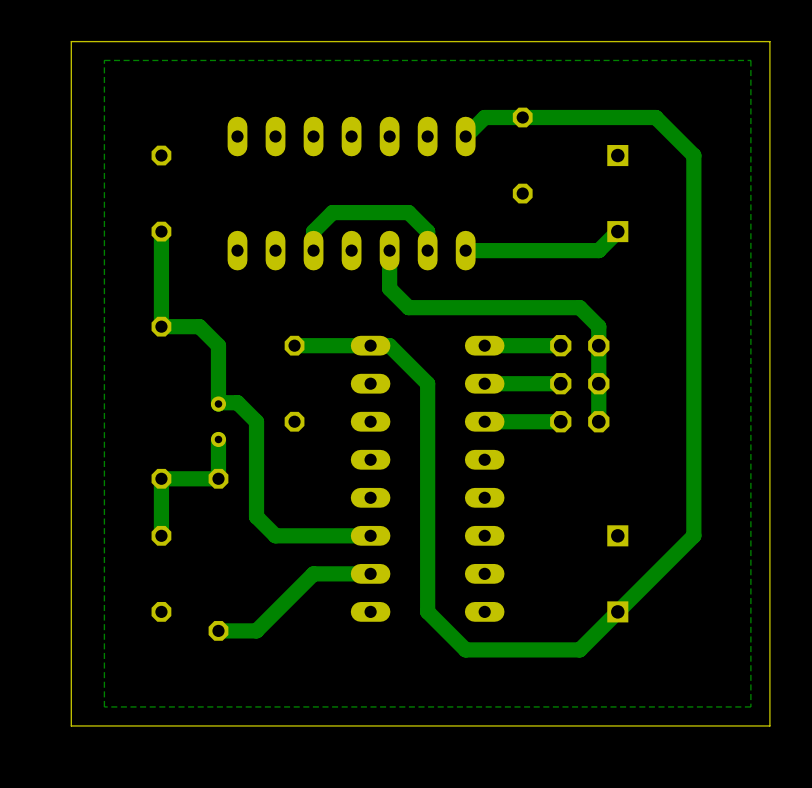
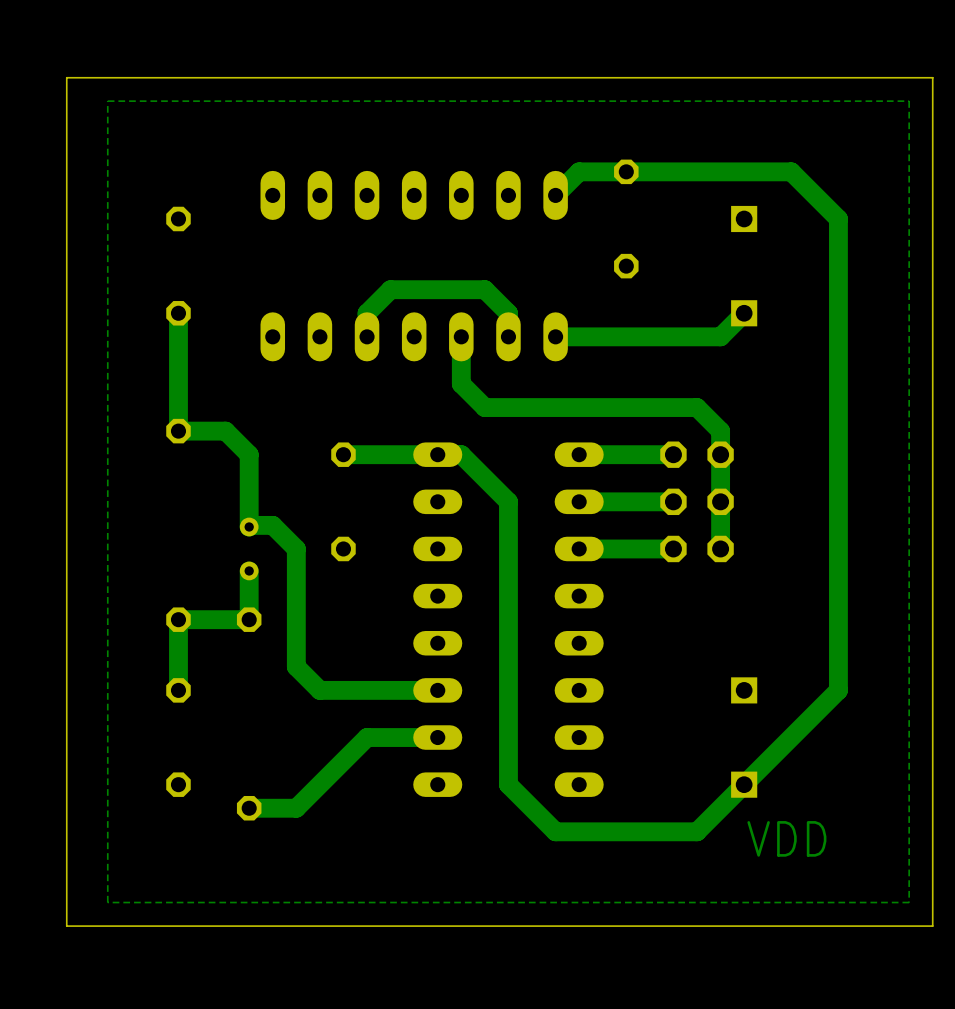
text: none -> VDD (786, 838)

